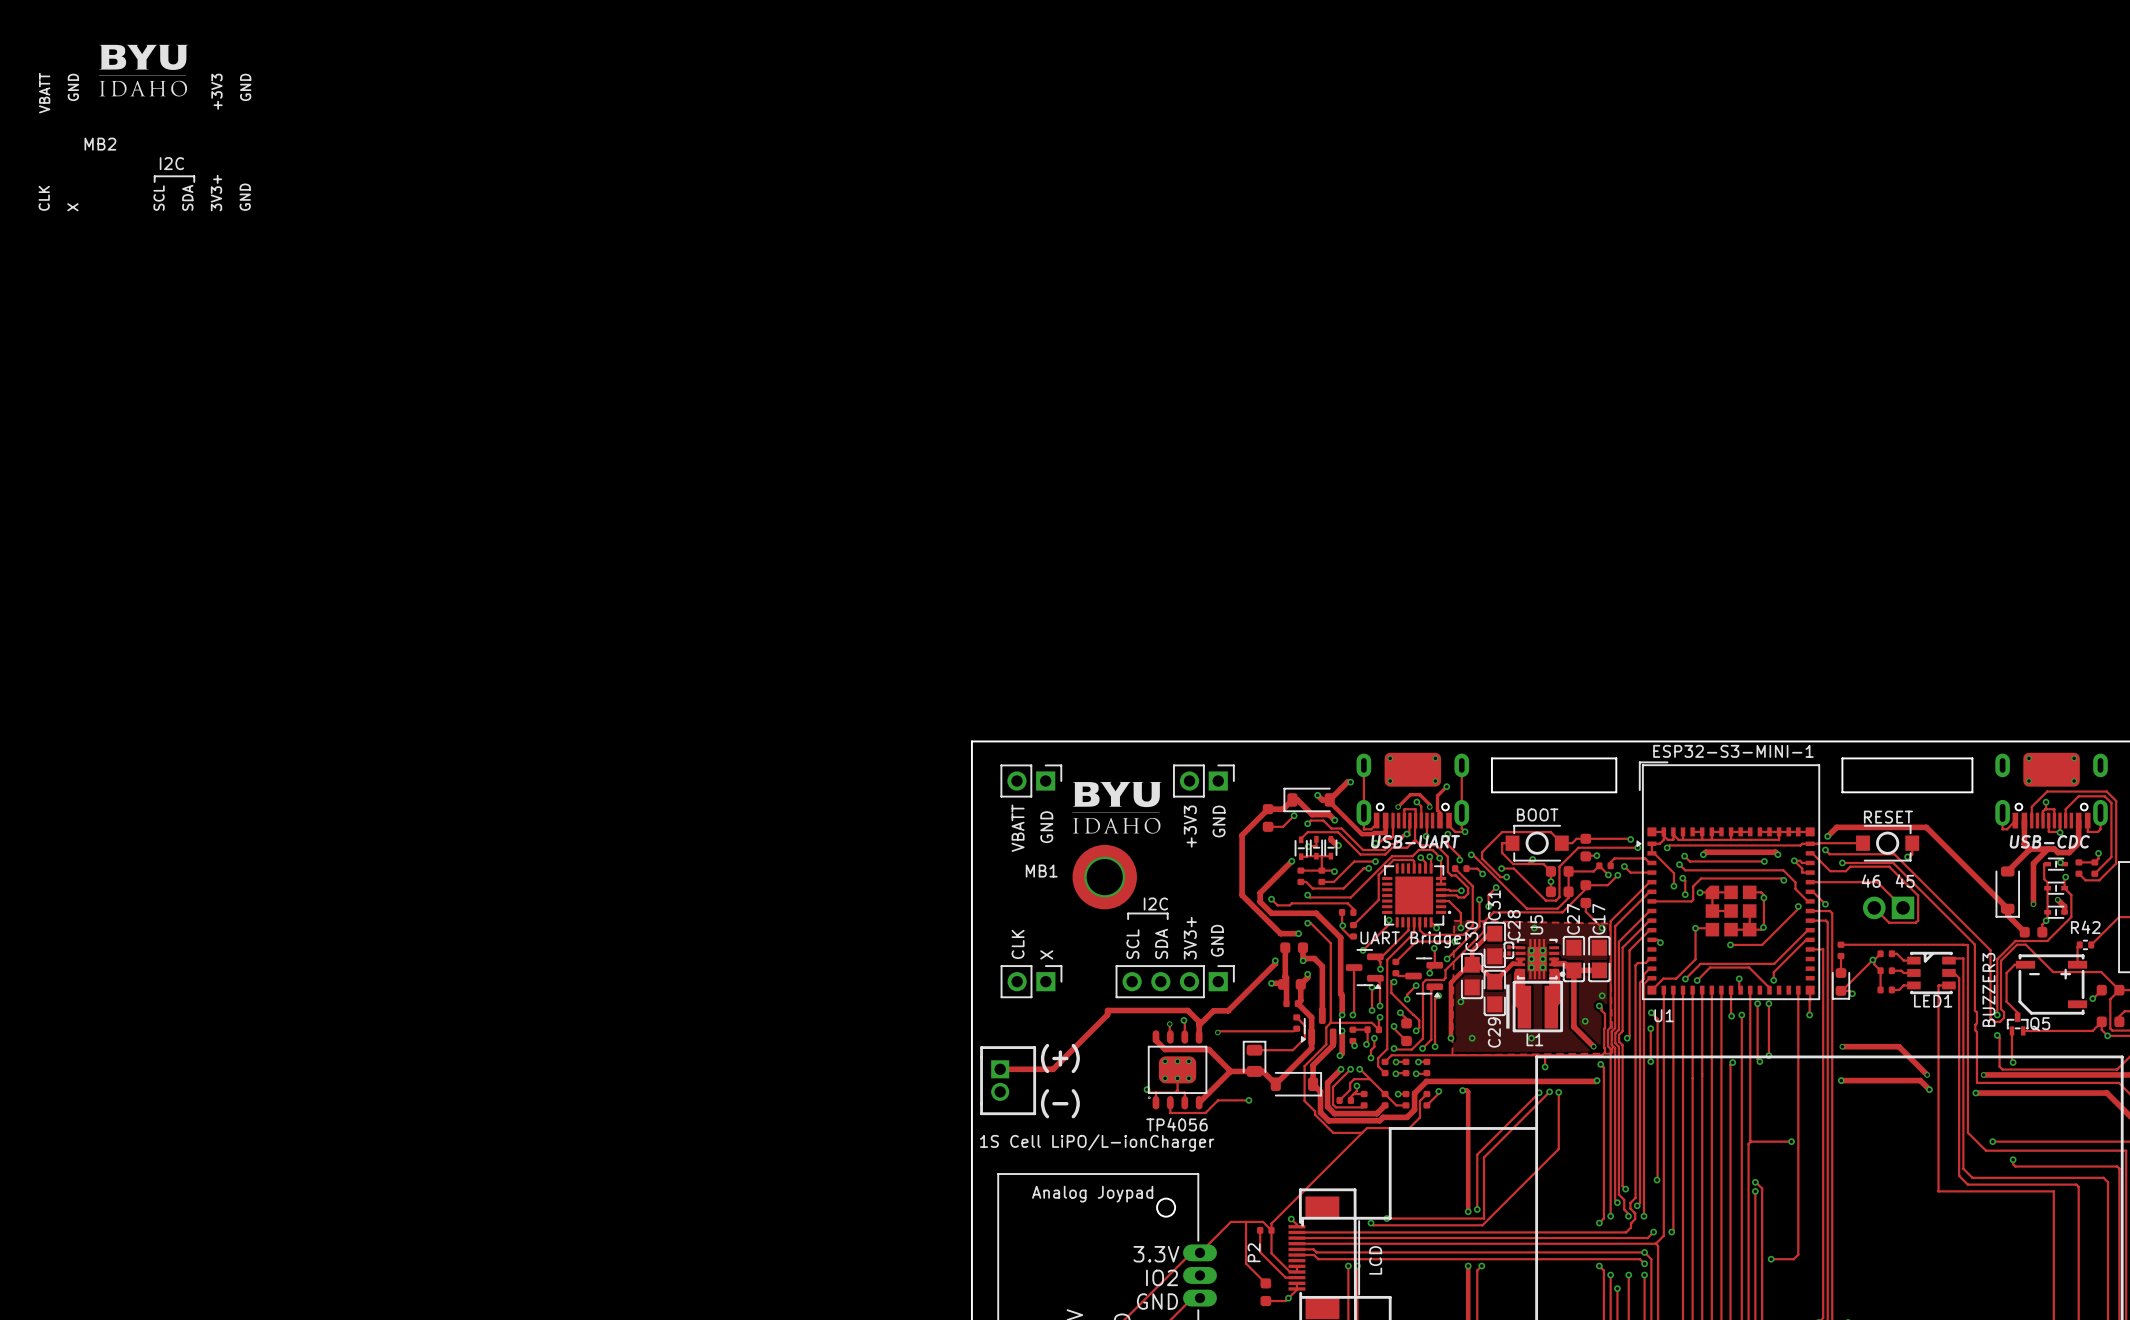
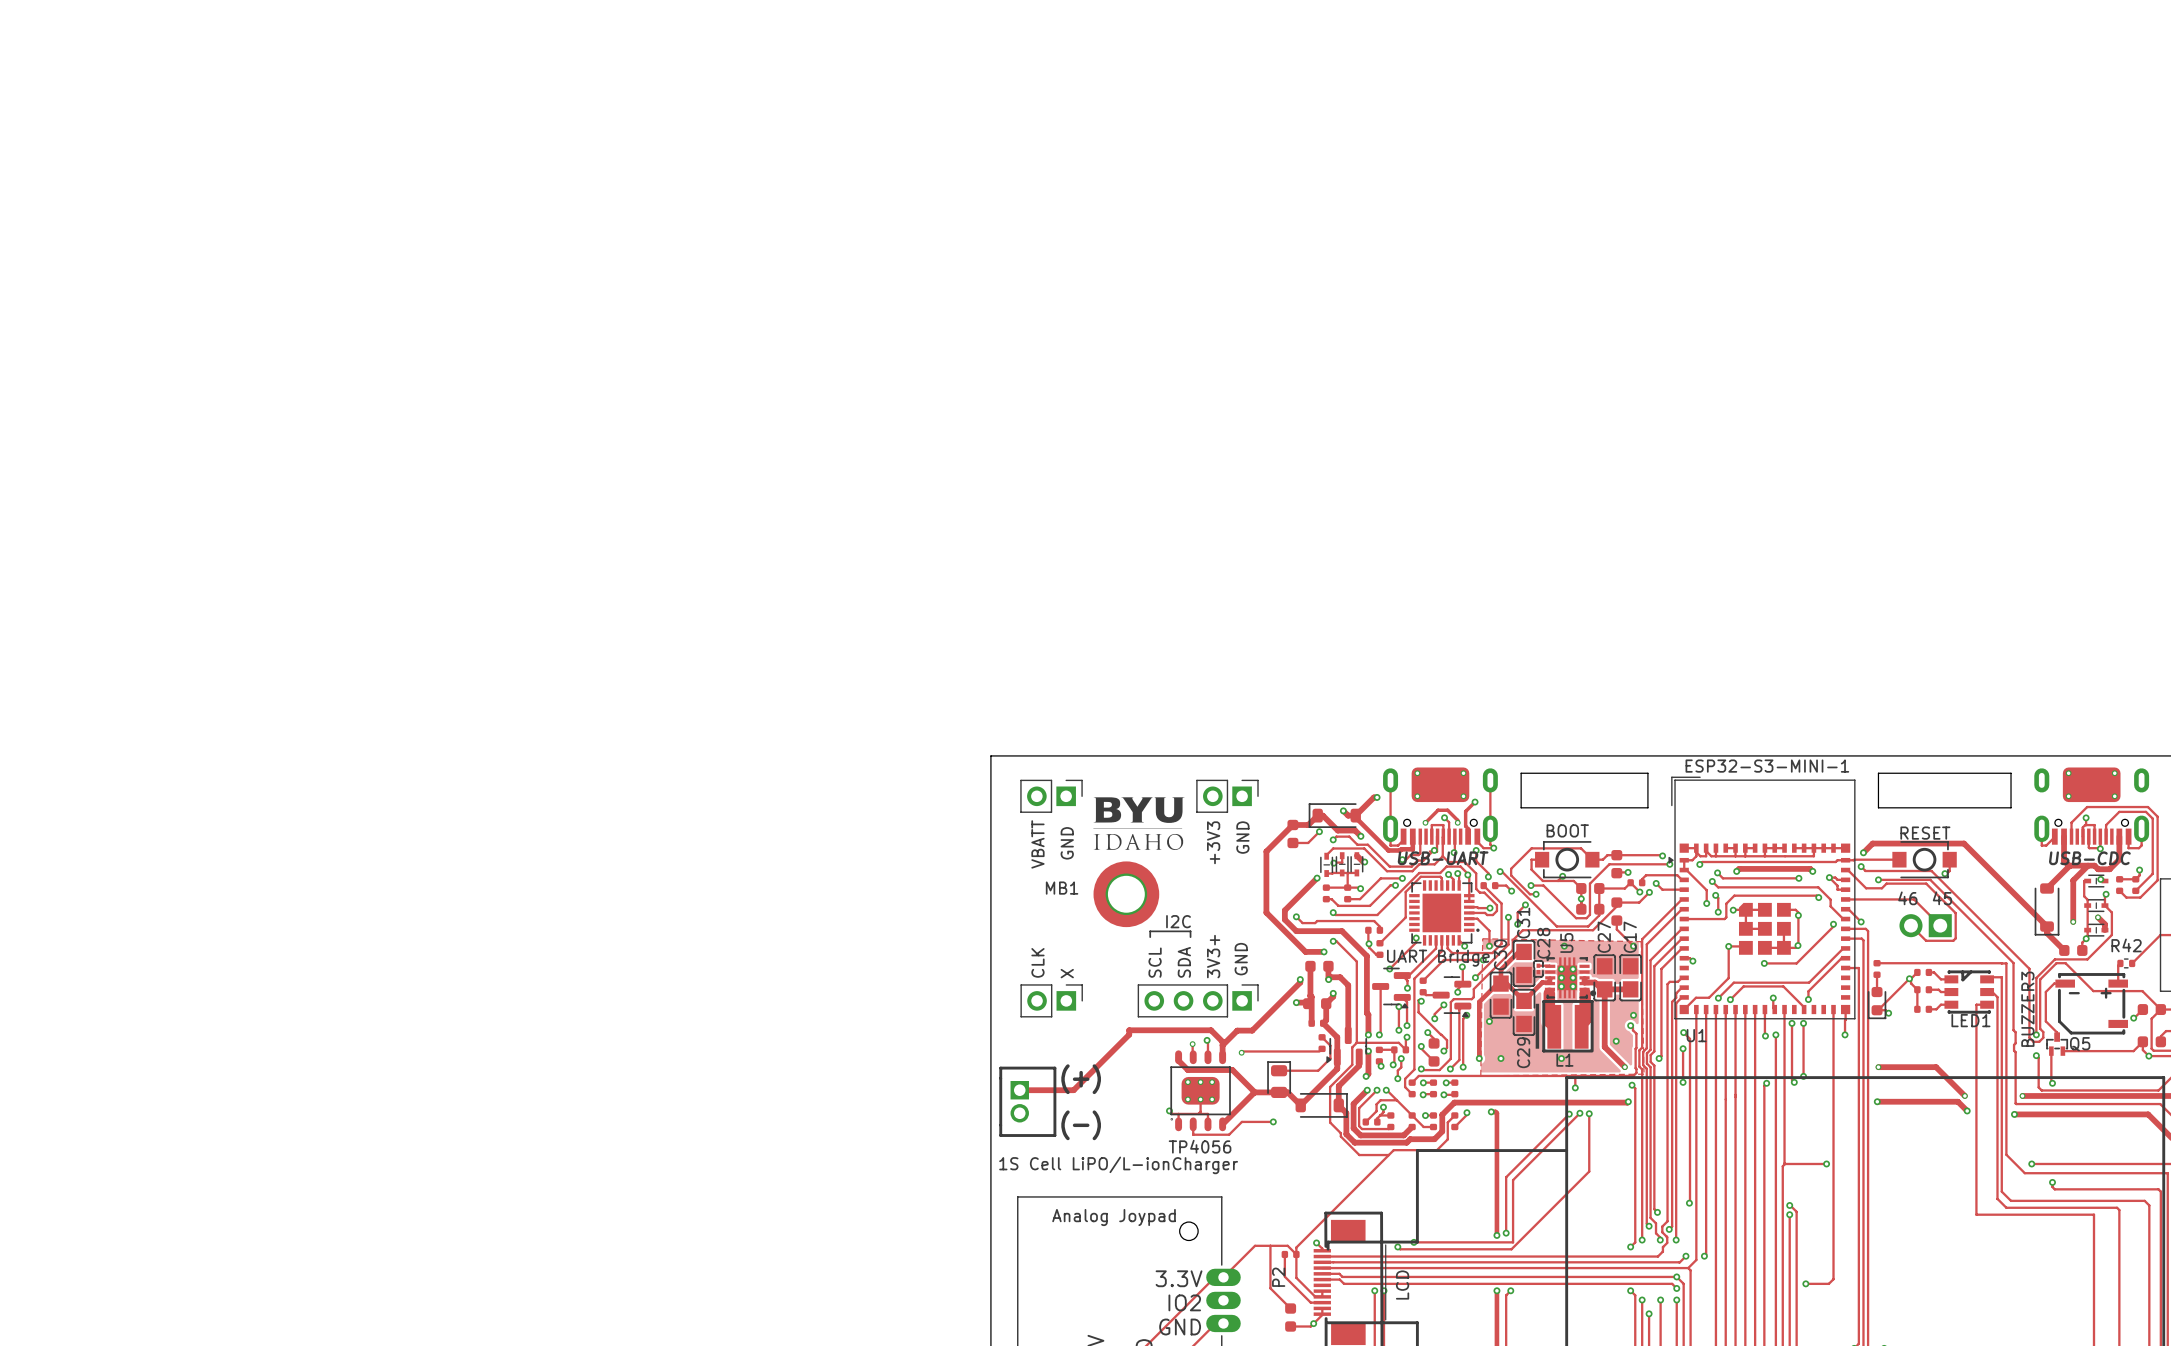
MB2: (147, 113) -> none

